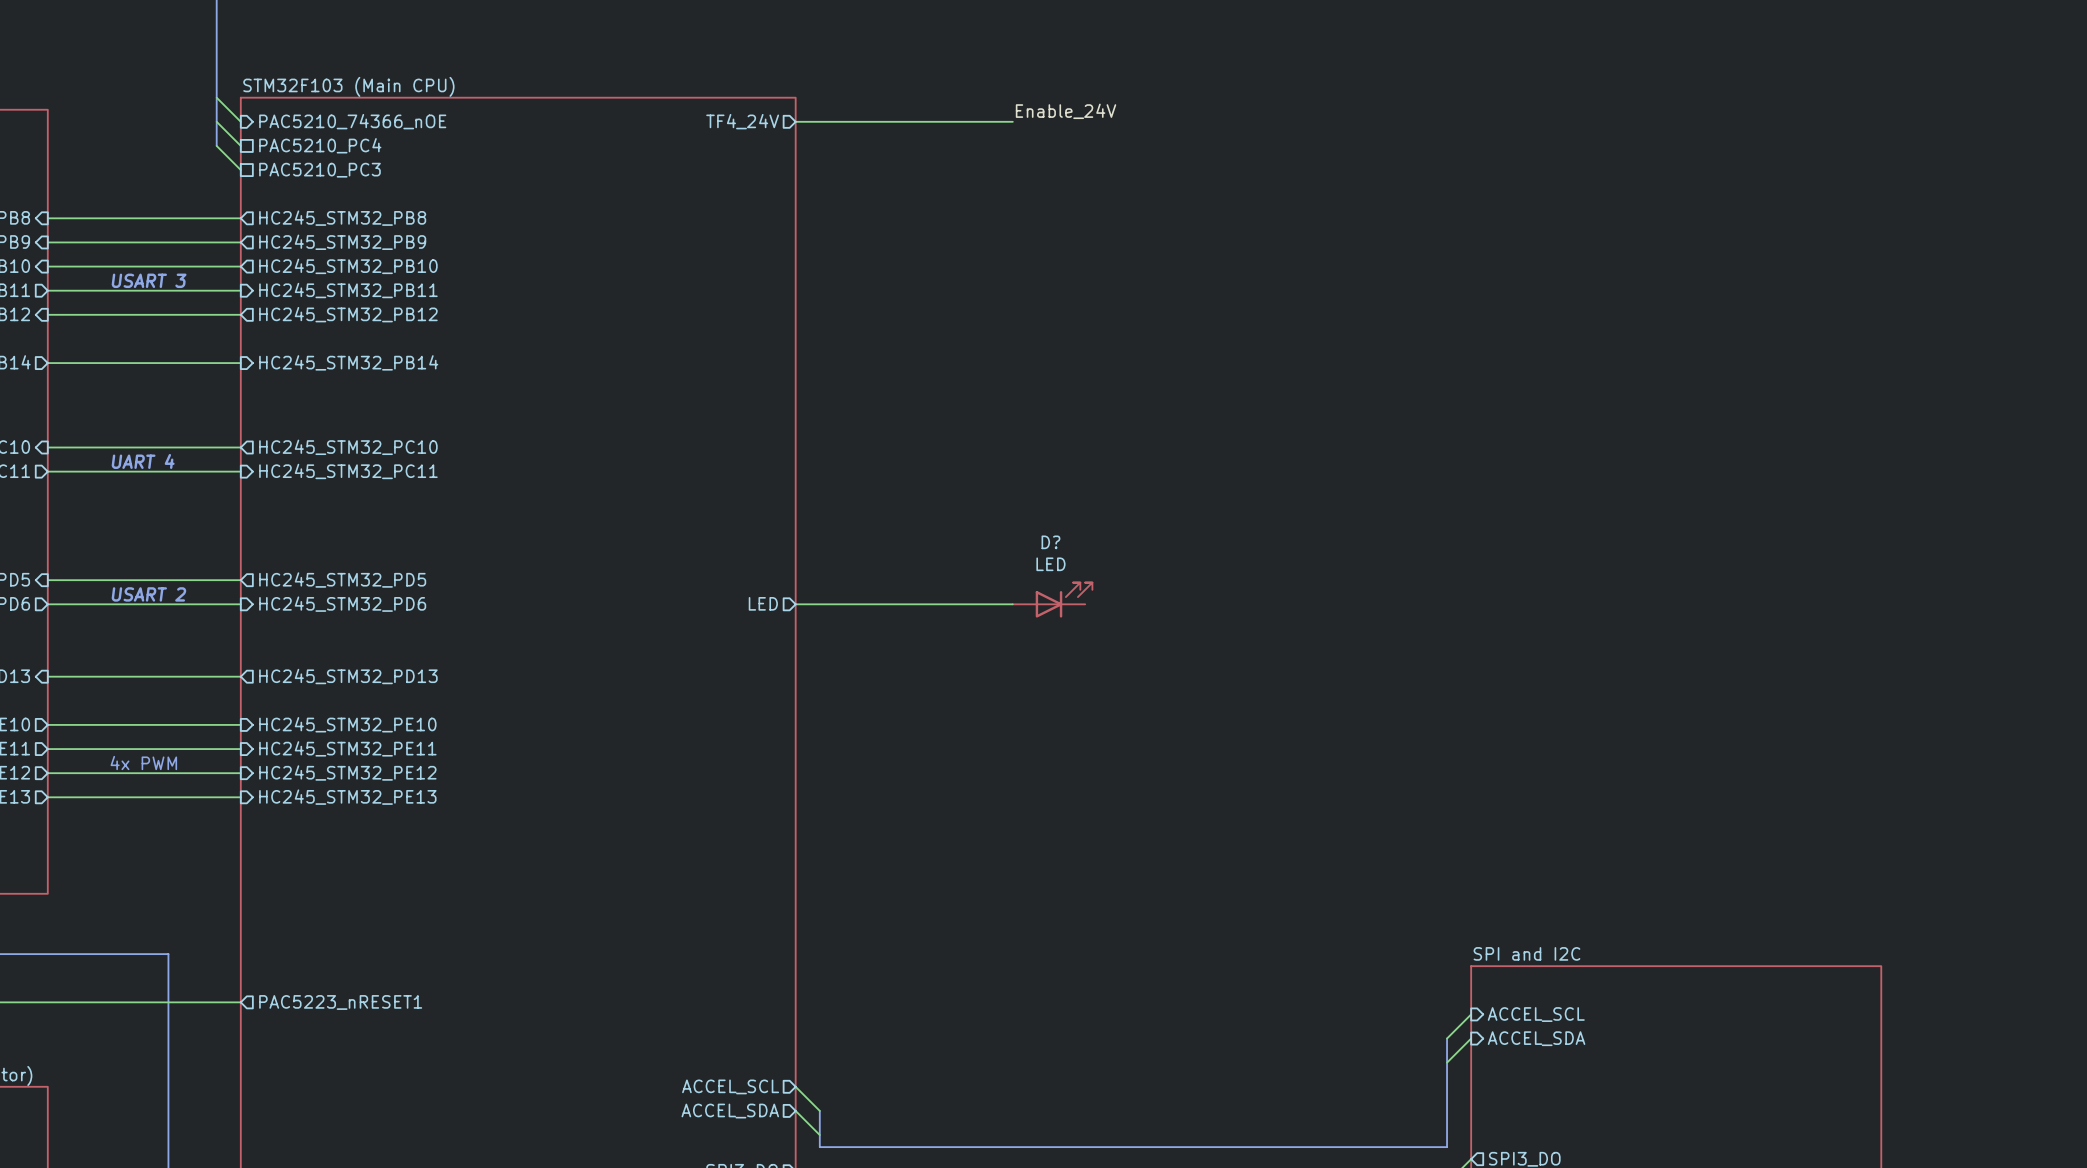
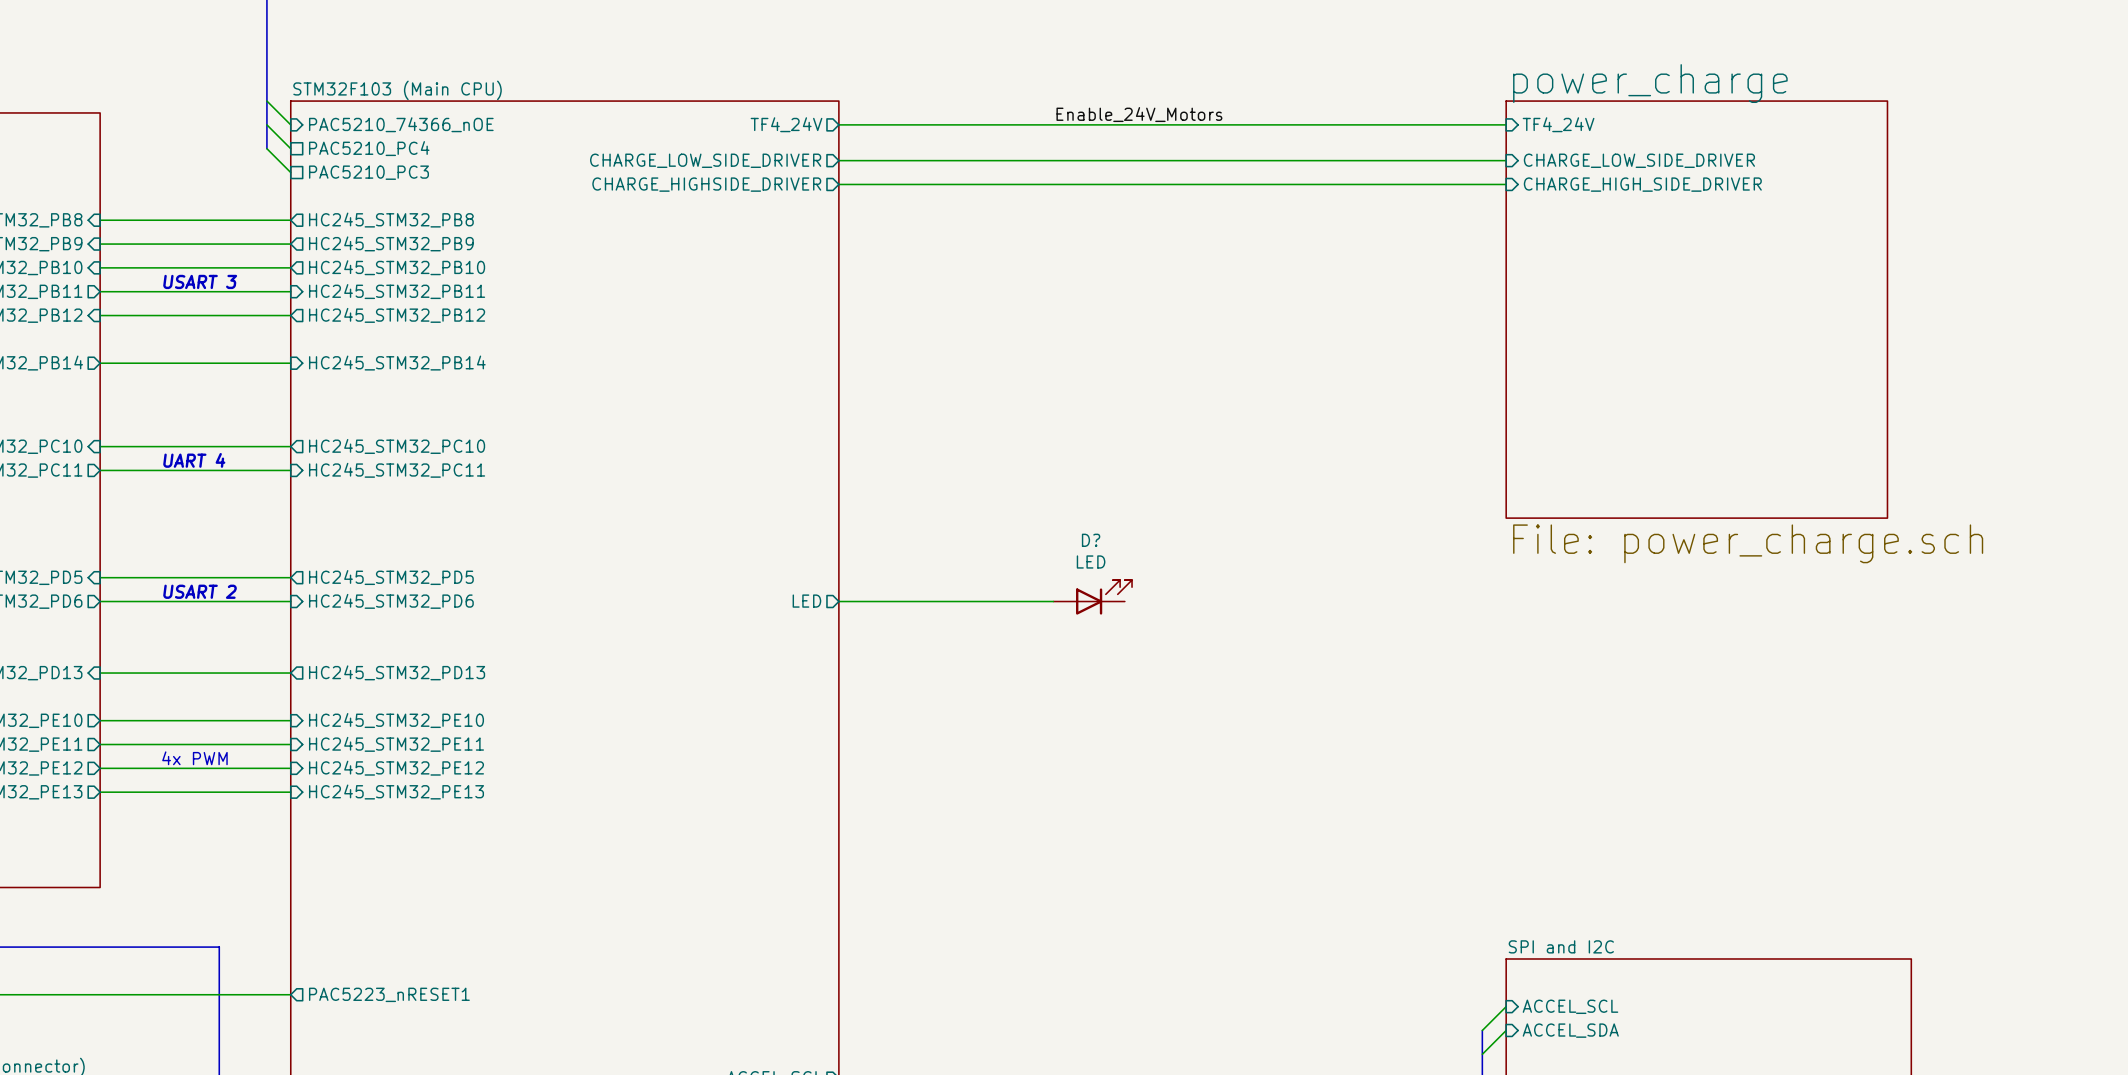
label: Enable_24V (1066, 111) -> Enable_24V_Motors (1139, 114)
wire: none -> (1053, 124) (1506, 124)
sheet pin: none -> TF4_24V (1558, 124)
sheet pin: none -> CHARGE_LOW_SIDE_DRIVER (705, 160)
wire: none -> (838, 160) (1506, 160)
sheet pin: none -> CHARGE_LOW_SIDE_DRIVER (1639, 160)
sheet pin: none -> CHARGE_HIGHSIDE_DRIVER (706, 184)
wire: none -> (838, 184) (1506, 184)
sheet pin: none -> CHARGE_HIGH_SIDE_DRIVER (1642, 184)
sheet power_charge: none -> File: power_charge.sch (1696, 309)

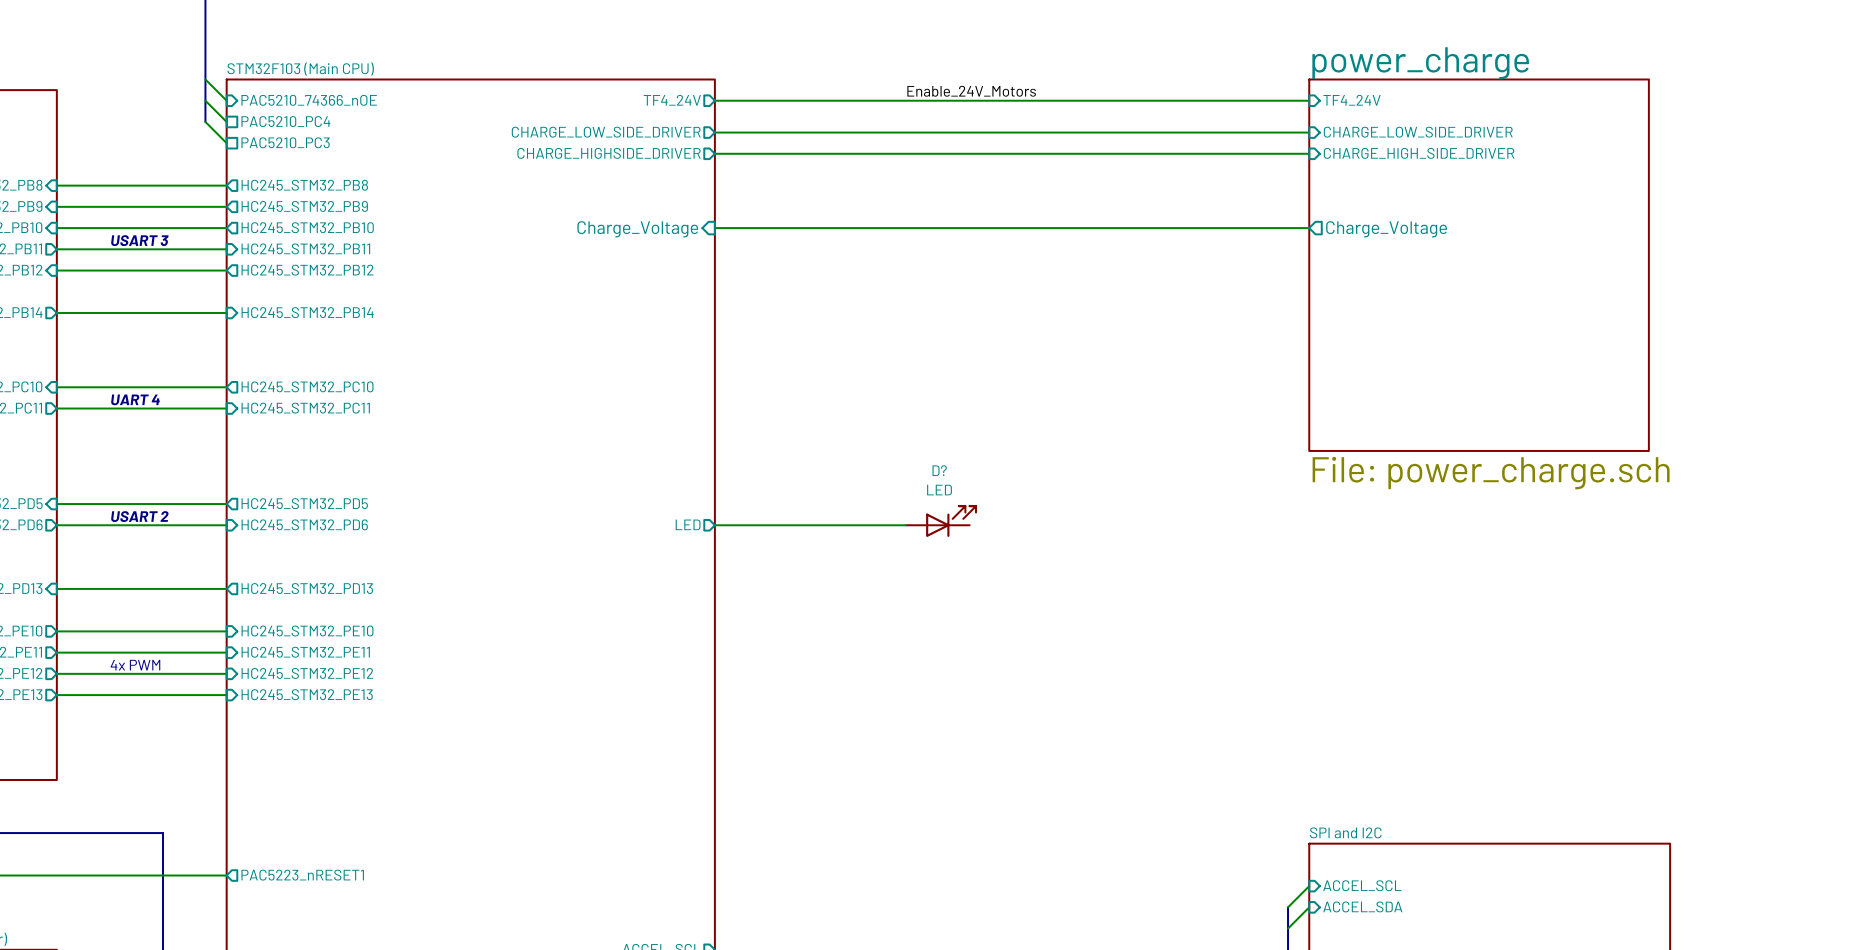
wire: none -> (714, 228) (1309, 228)
sheet pin: none -> Charge_Voltage (637, 229)
sheet pin: none -> Charge_Voltage (1386, 229)

